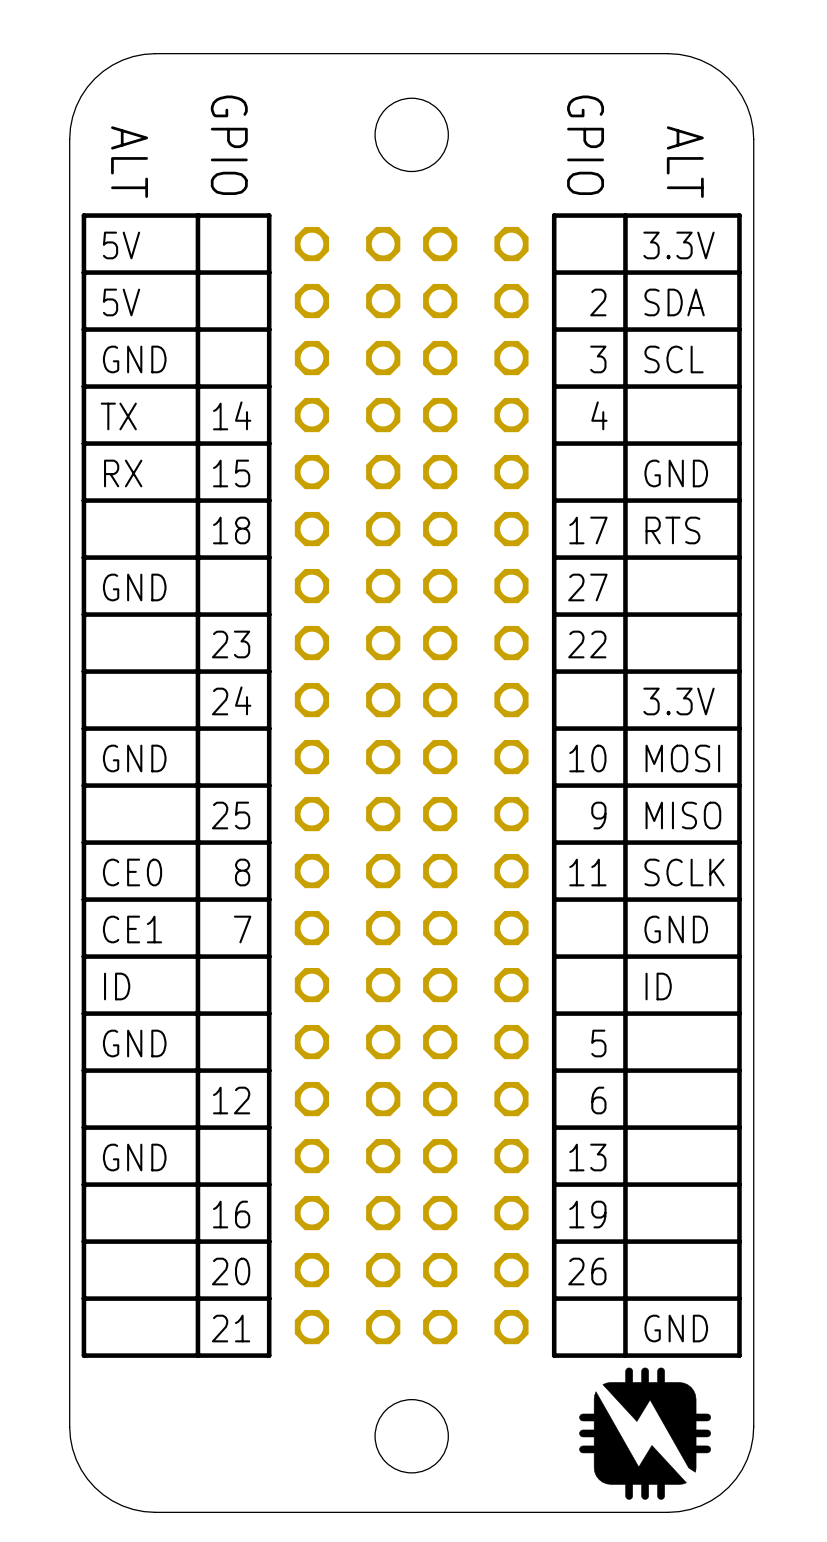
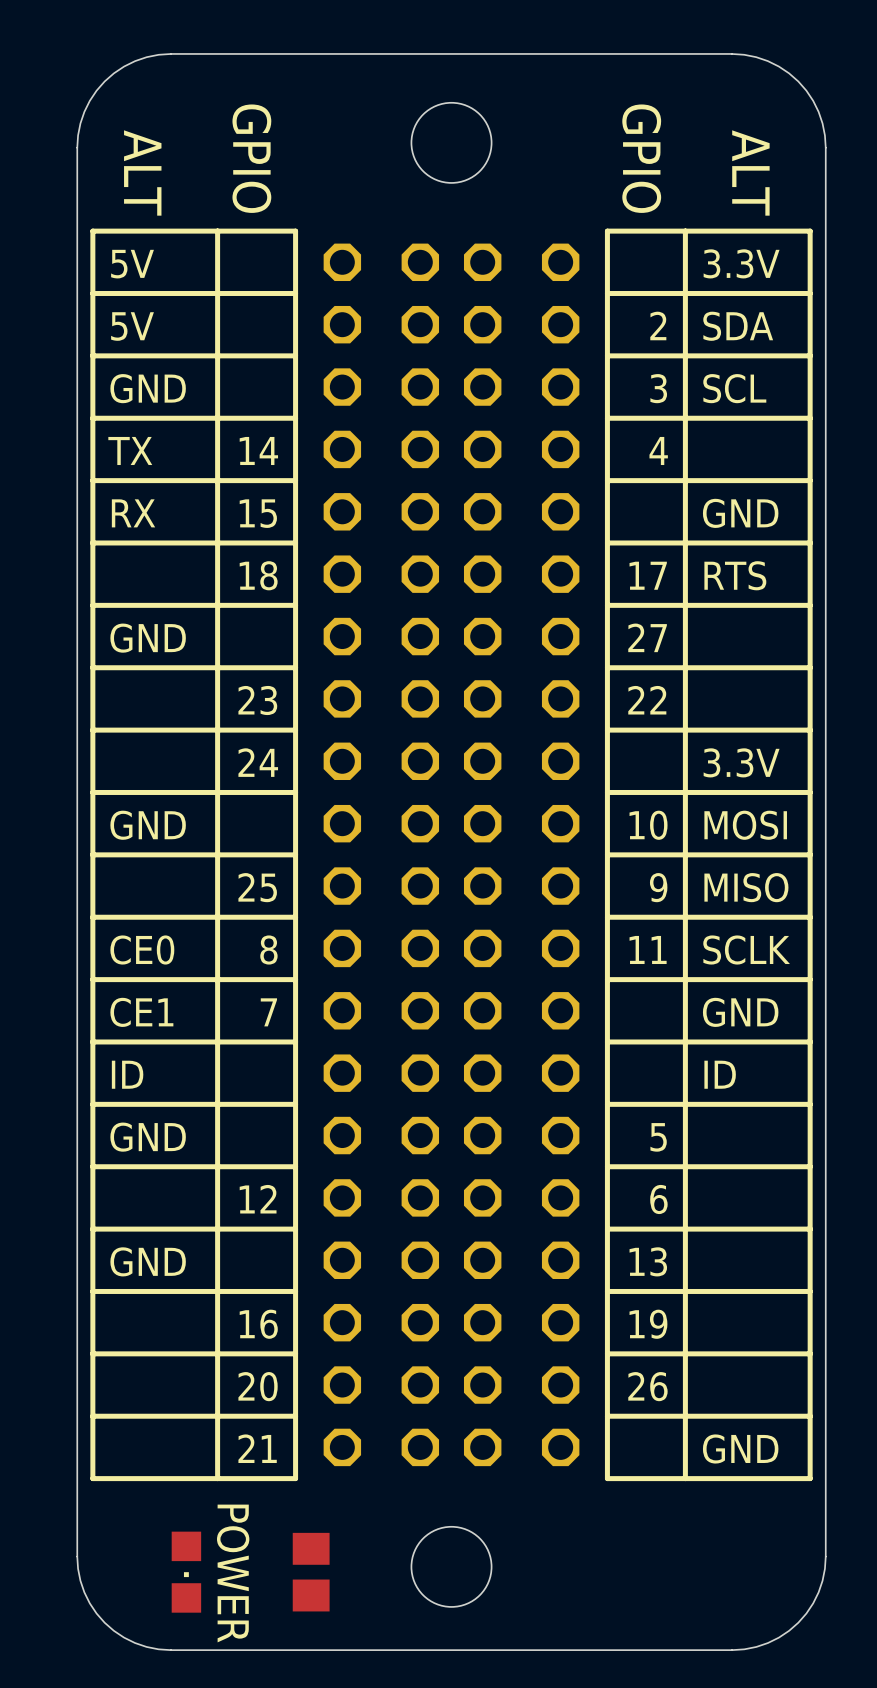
drawing: [579, 1367, 711, 1500] -> none
part: none -> (186, 1572)
text: none -> POWER (233, 1573)
part: none -> (311, 1572)

